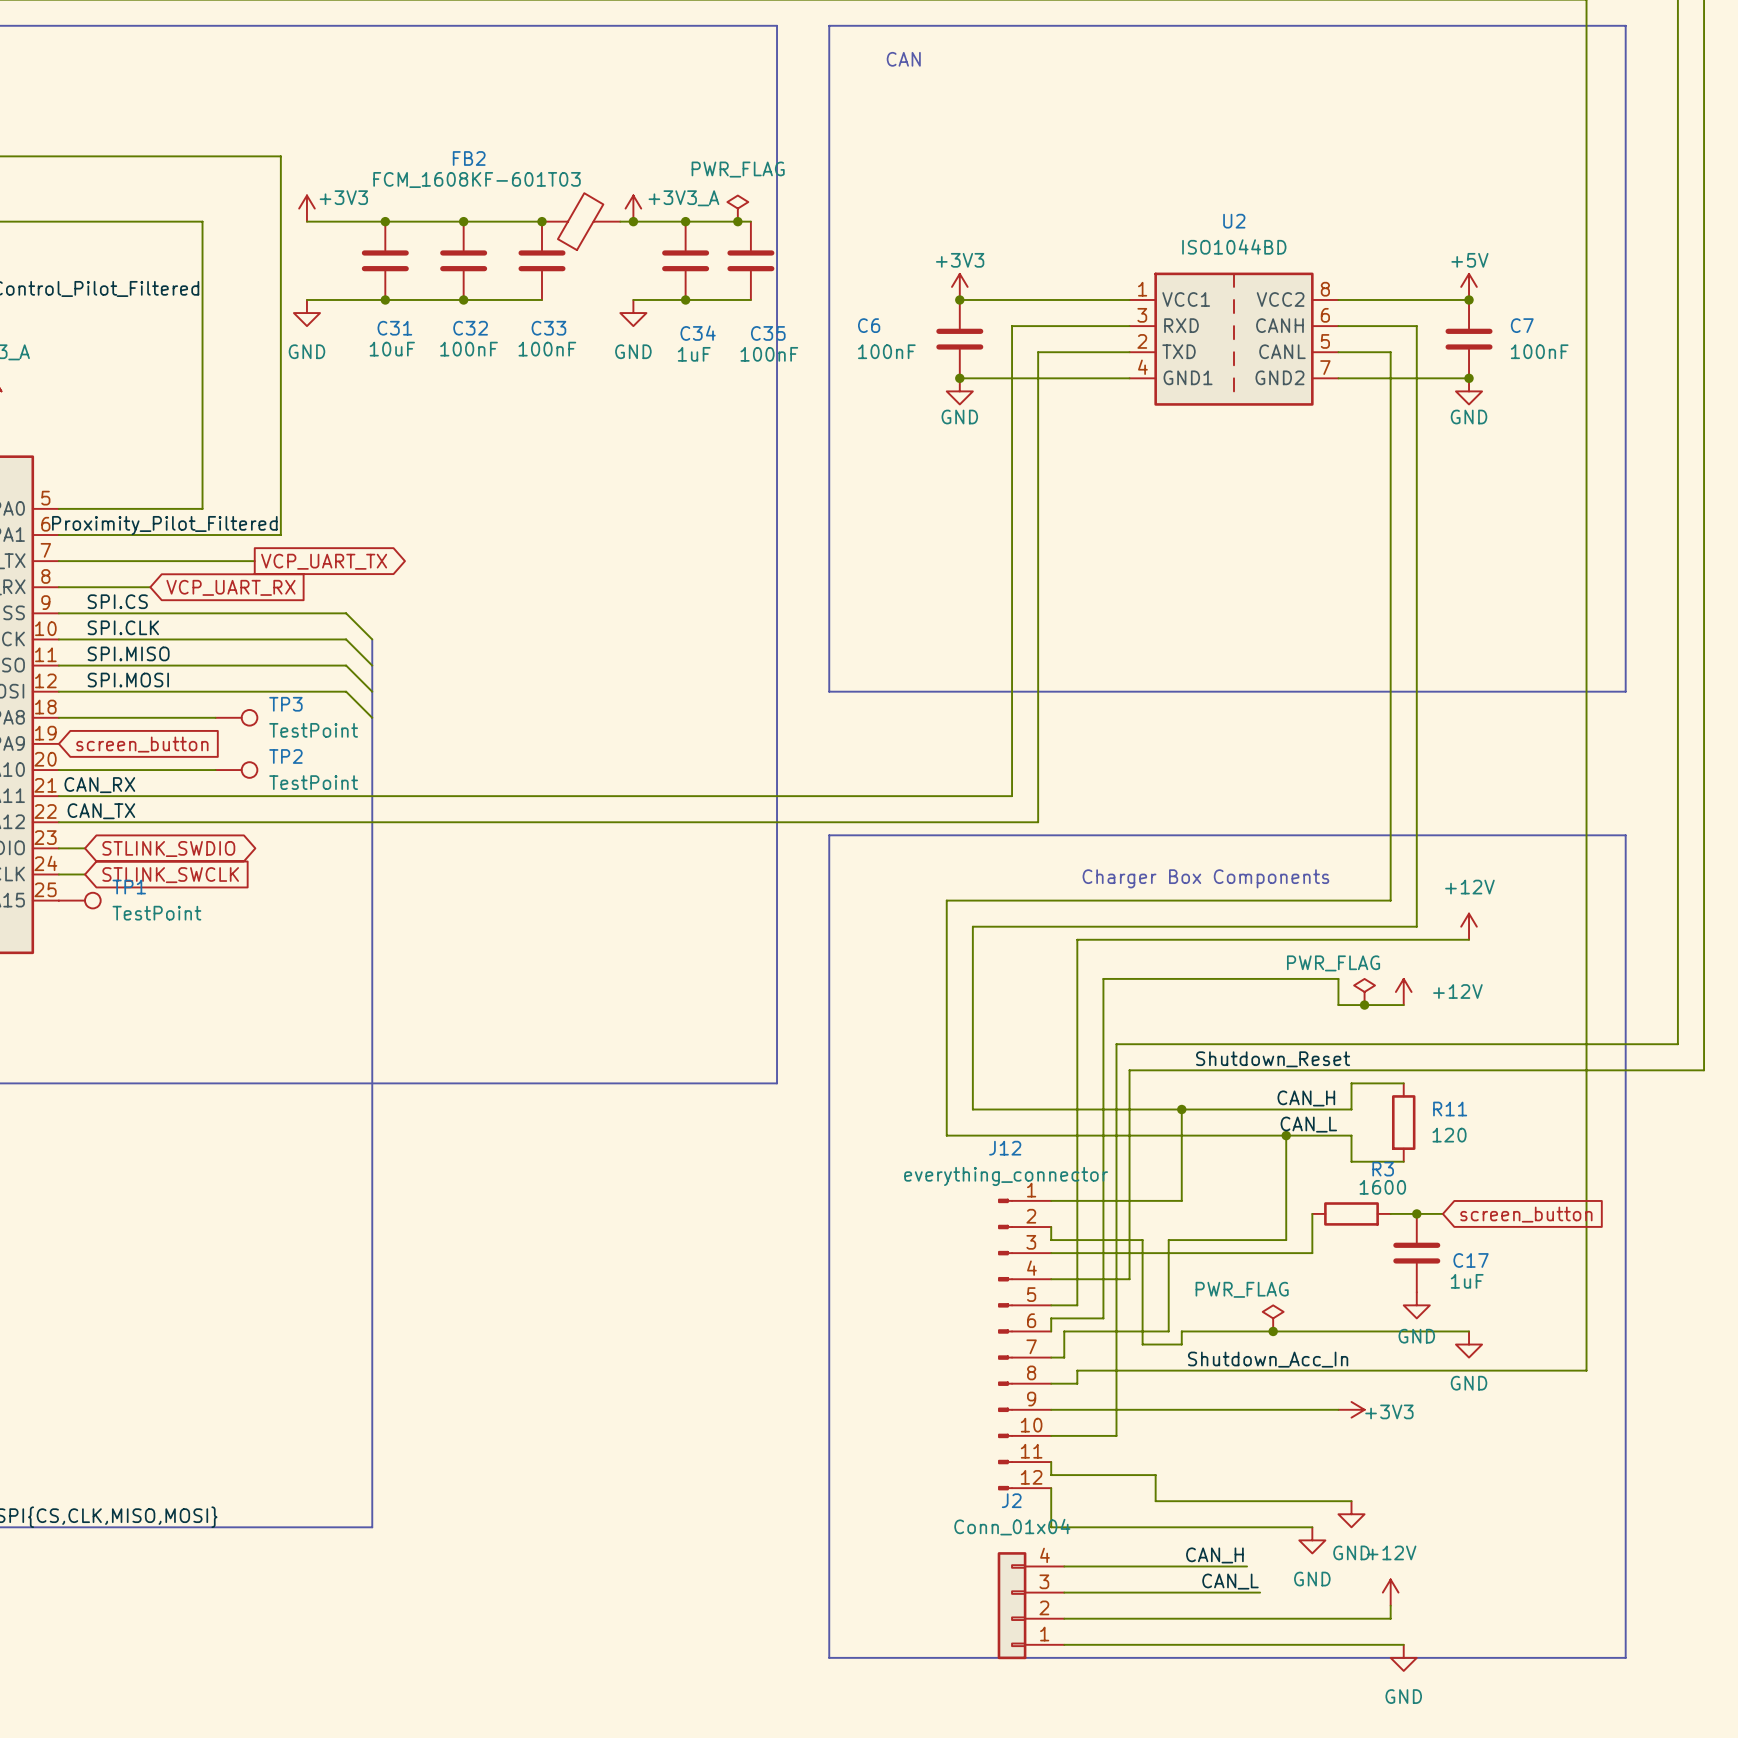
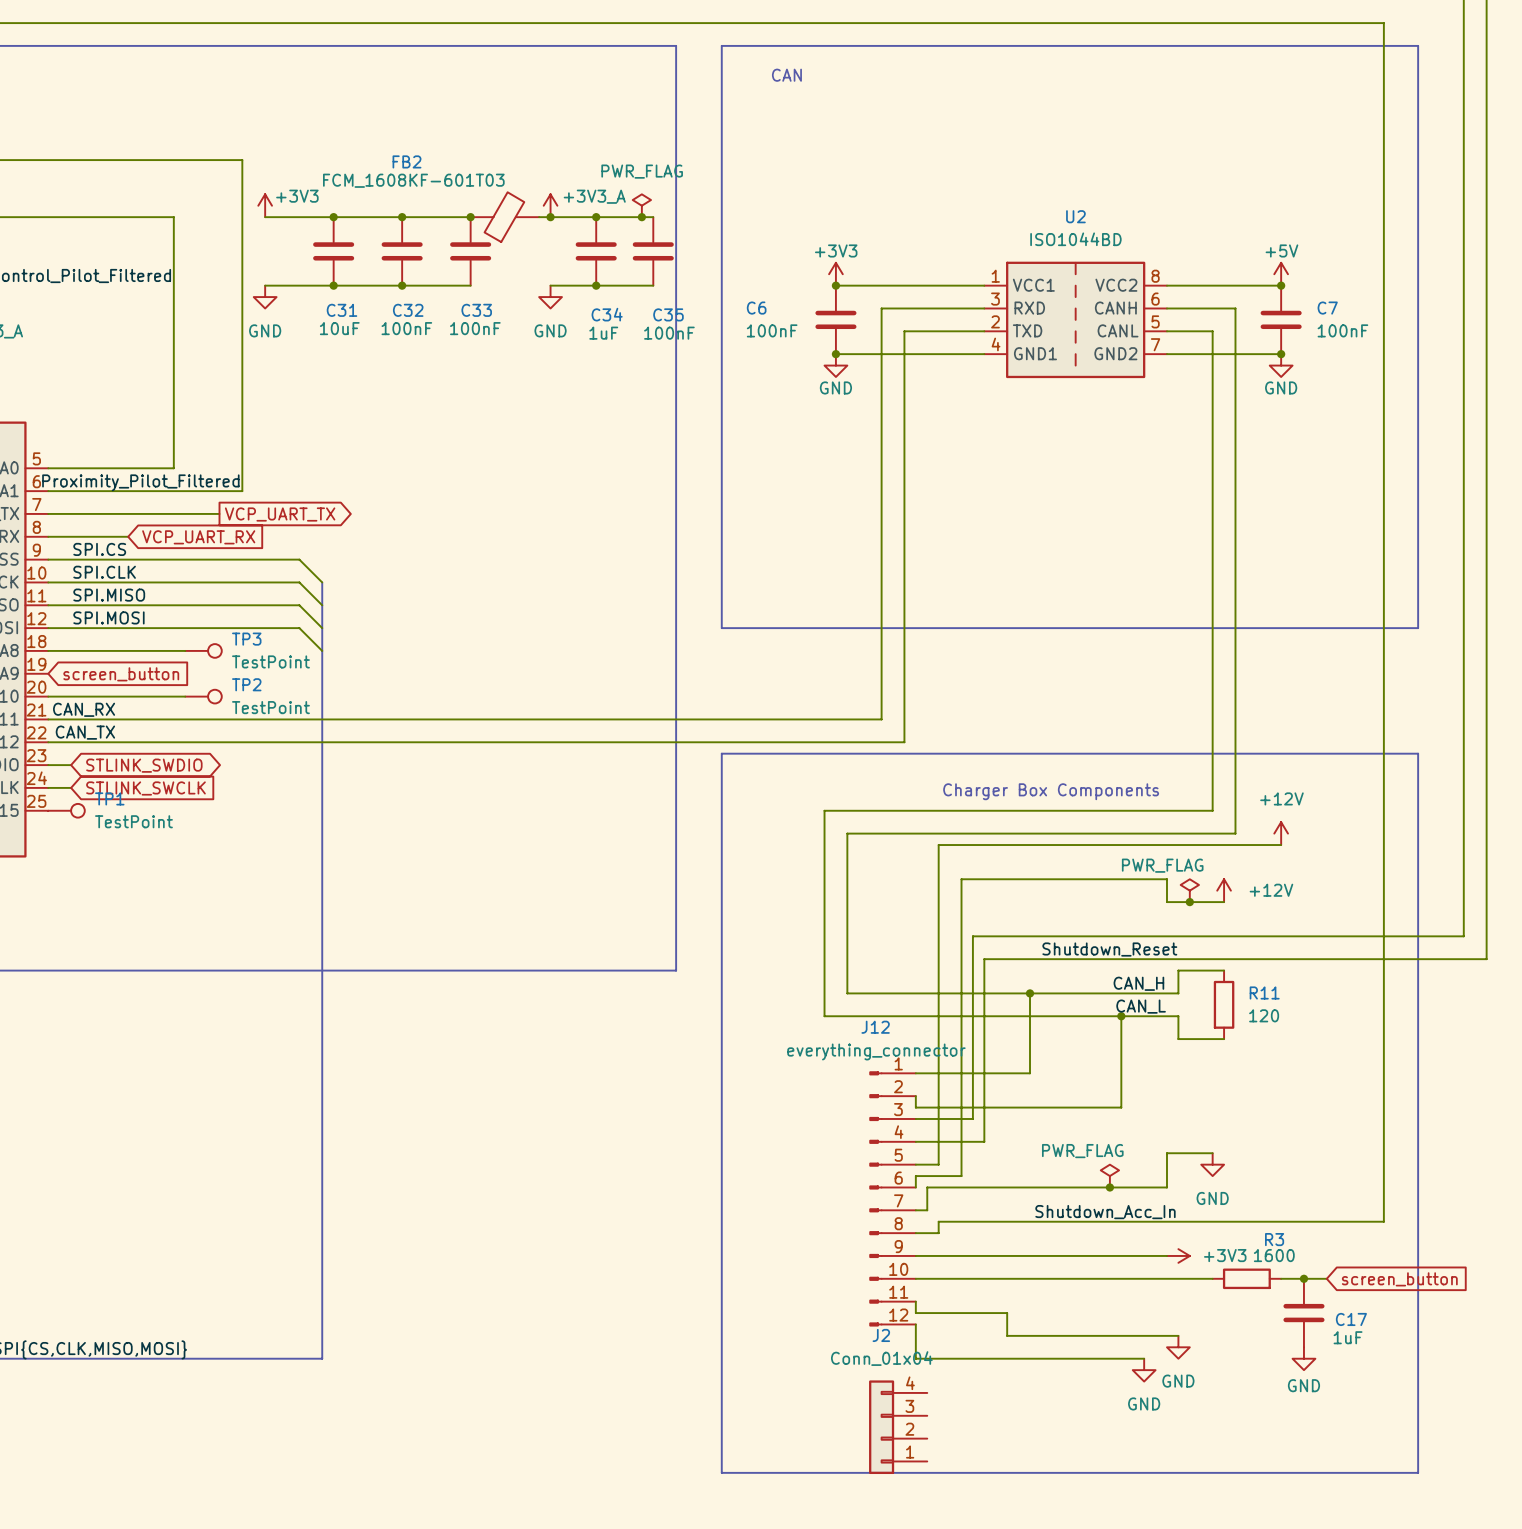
wire: (1312, 1213) (1312, 1253) (1116, 1253) (1116, 1435) -> (1212, 1278) (972, 1278)
R3 position: (1351, 1213) -> (1246, 1278)
wire: (1390, 1213) (1442, 1213) -> (1281, 1278) (1326, 1278)
junction: (1416, 1213) -> none
global label position: screen_button (1526, 1214) -> screen_button (1399, 1279)
wire: (1142, 1240) (1142, 1344) (1181, 1344) (1181, 1331) -> (995, 1107) (1018, 1107)
wire: (1168, 1240) (1168, 1331) -> (1030, 1187) (1018, 1187)
C17 position: (1416, 1253) -> (1303, 1313)
power symbol position: GND (1416, 1305) -> GND (1212, 1164)
wire: (1338, 1331) (1469, 1331) -> (1166, 1187) (1166, 1153) (1212, 1153)
power symbol text position: GND (1416, 1336) -> GND (1212, 1198)
power symbol: GND (1469, 1344) -> none
power symbol text position: +3V3 (1389, 1411) -> +3V3 (1225, 1255)
junction: none -> (1303, 1278)
power symbol: none -> GND (1303, 1358)
label: CAN_H (1214, 1555) -> none
wire: (1064, 1566) (1247, 1566) -> none
label: CAN_L (1230, 1581) -> none
wire: (1064, 1592) (1260, 1592) -> none
power symbol: +12V (1390, 1592) -> none
wire: (1390, 1605) (1390, 1618) (1064, 1618) -> none
wire: (1064, 1644) (1403, 1644) -> none
power symbol: GND (1403, 1657) -> none

